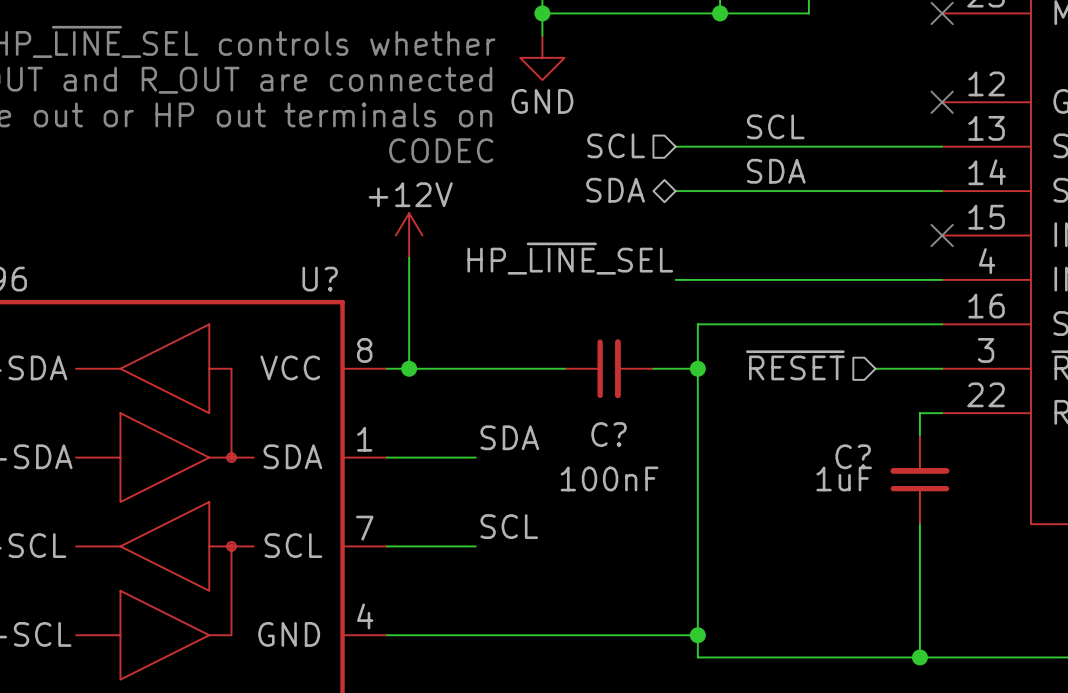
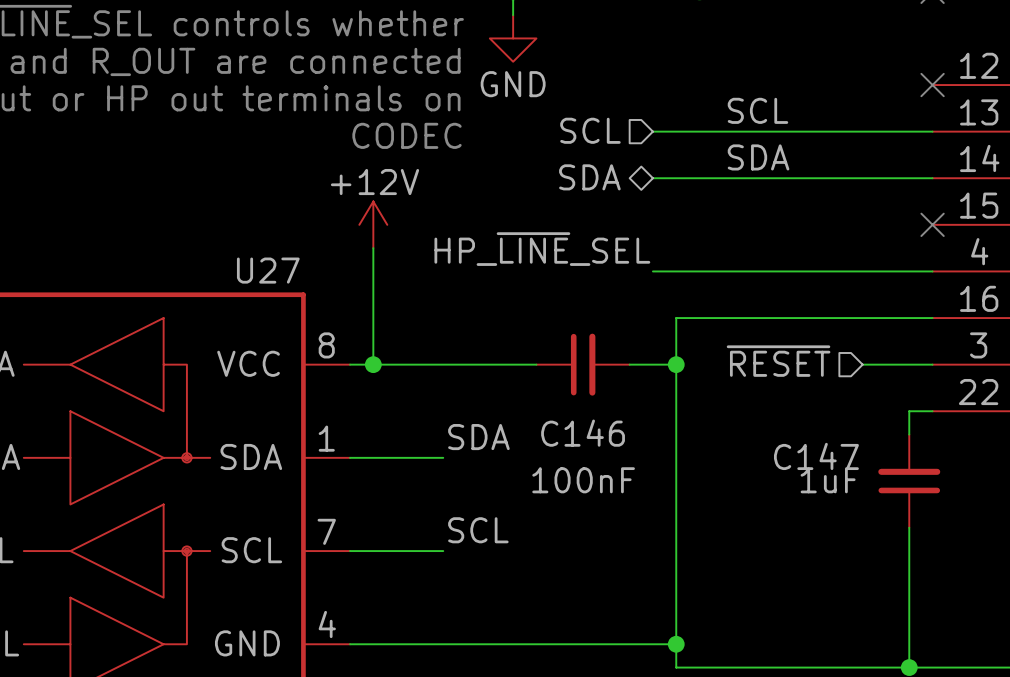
U? name: U? (320, 279) -> U27 (268, 270)
C? name: C? (609, 434) -> C146 (583, 433)
C? name: C? (853, 456) -> C147 (816, 456)

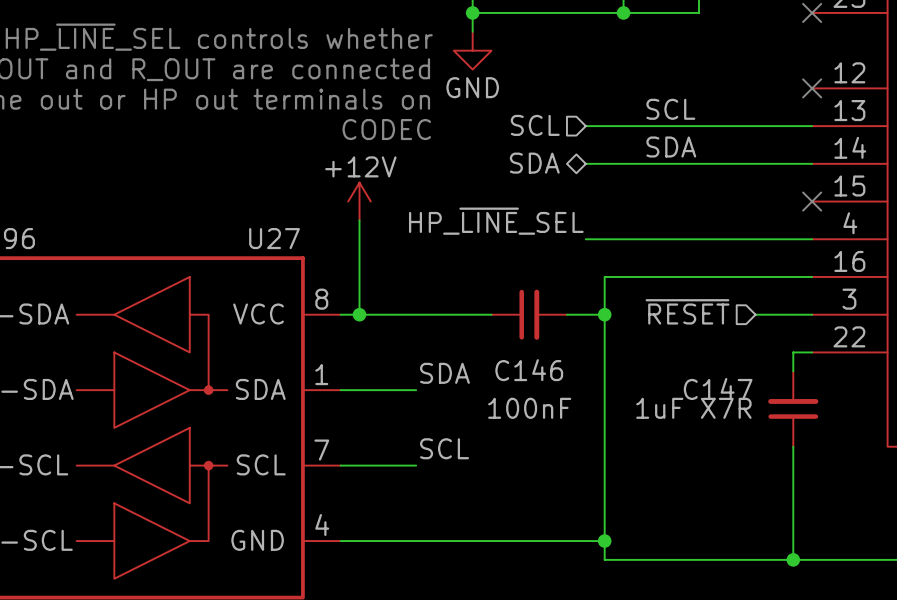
C147 value: 1uF (829, 480) -> 1uF X7R (693, 408)

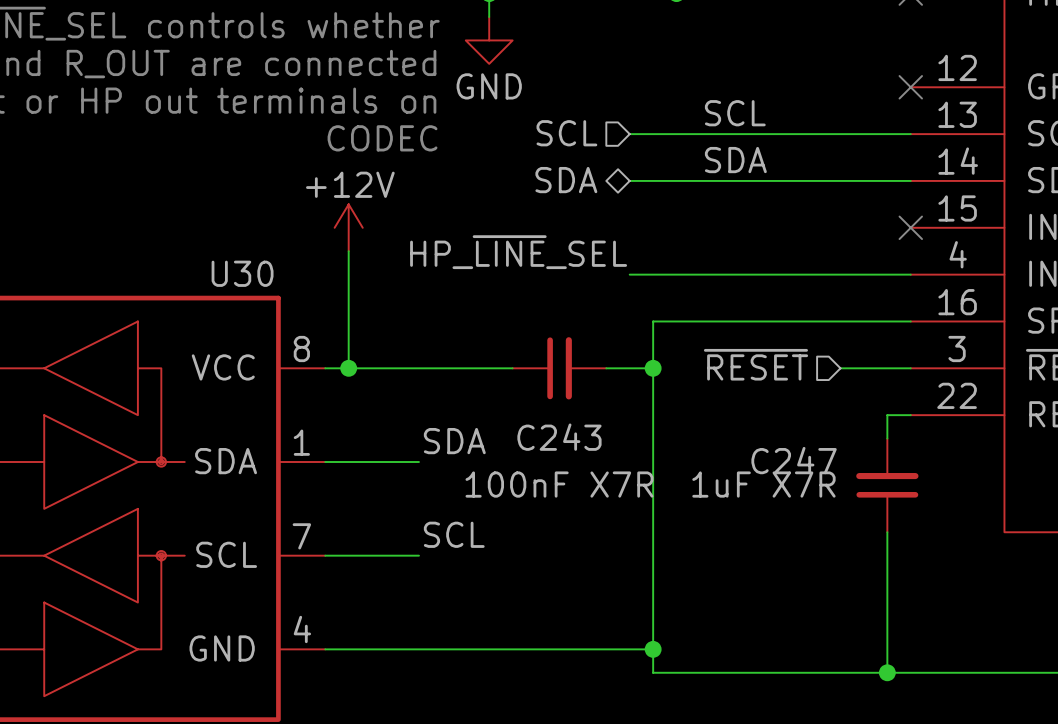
U27 name: U27 (274, 238) -> U30 (242, 273)
C146 name: C146 (529, 370) -> C243 (559, 437)
C147 name: C147 (718, 389) -> C247 (794, 460)
C146 value: 100nF (529, 408) -> 100nF X7R (559, 484)

